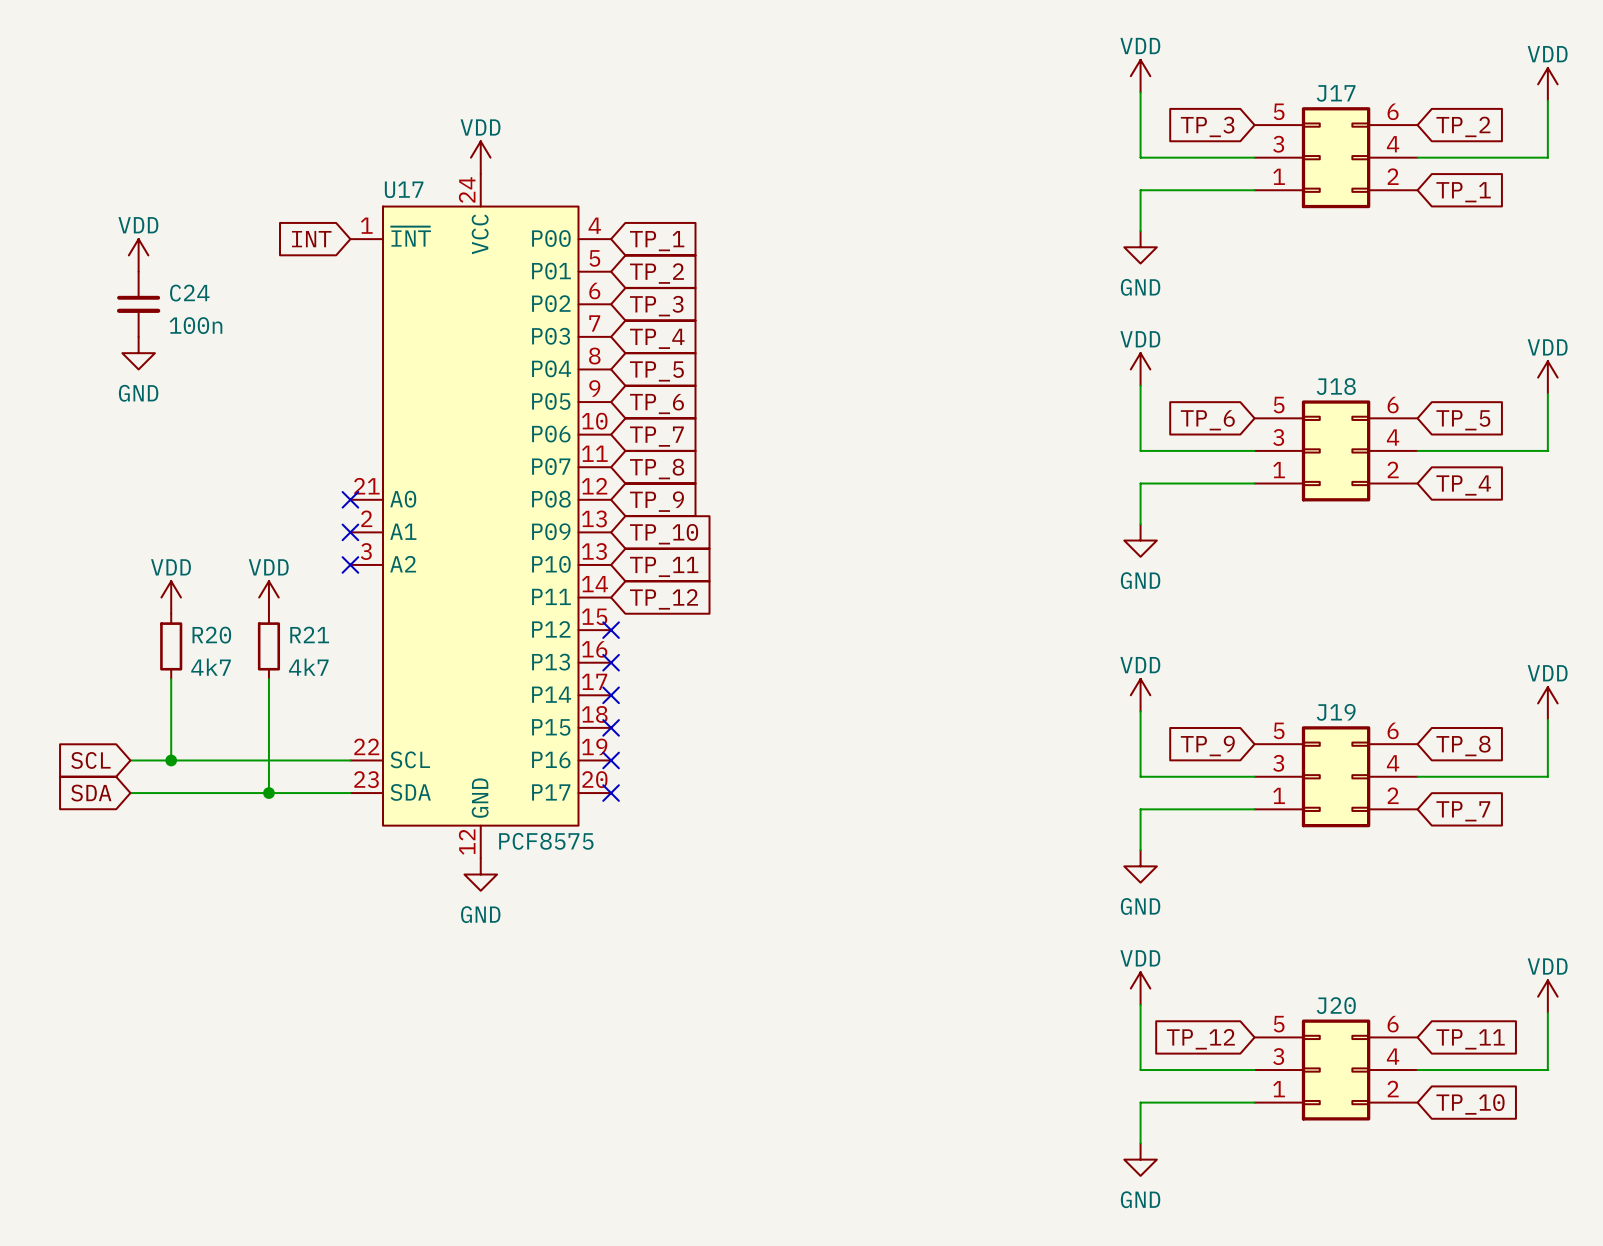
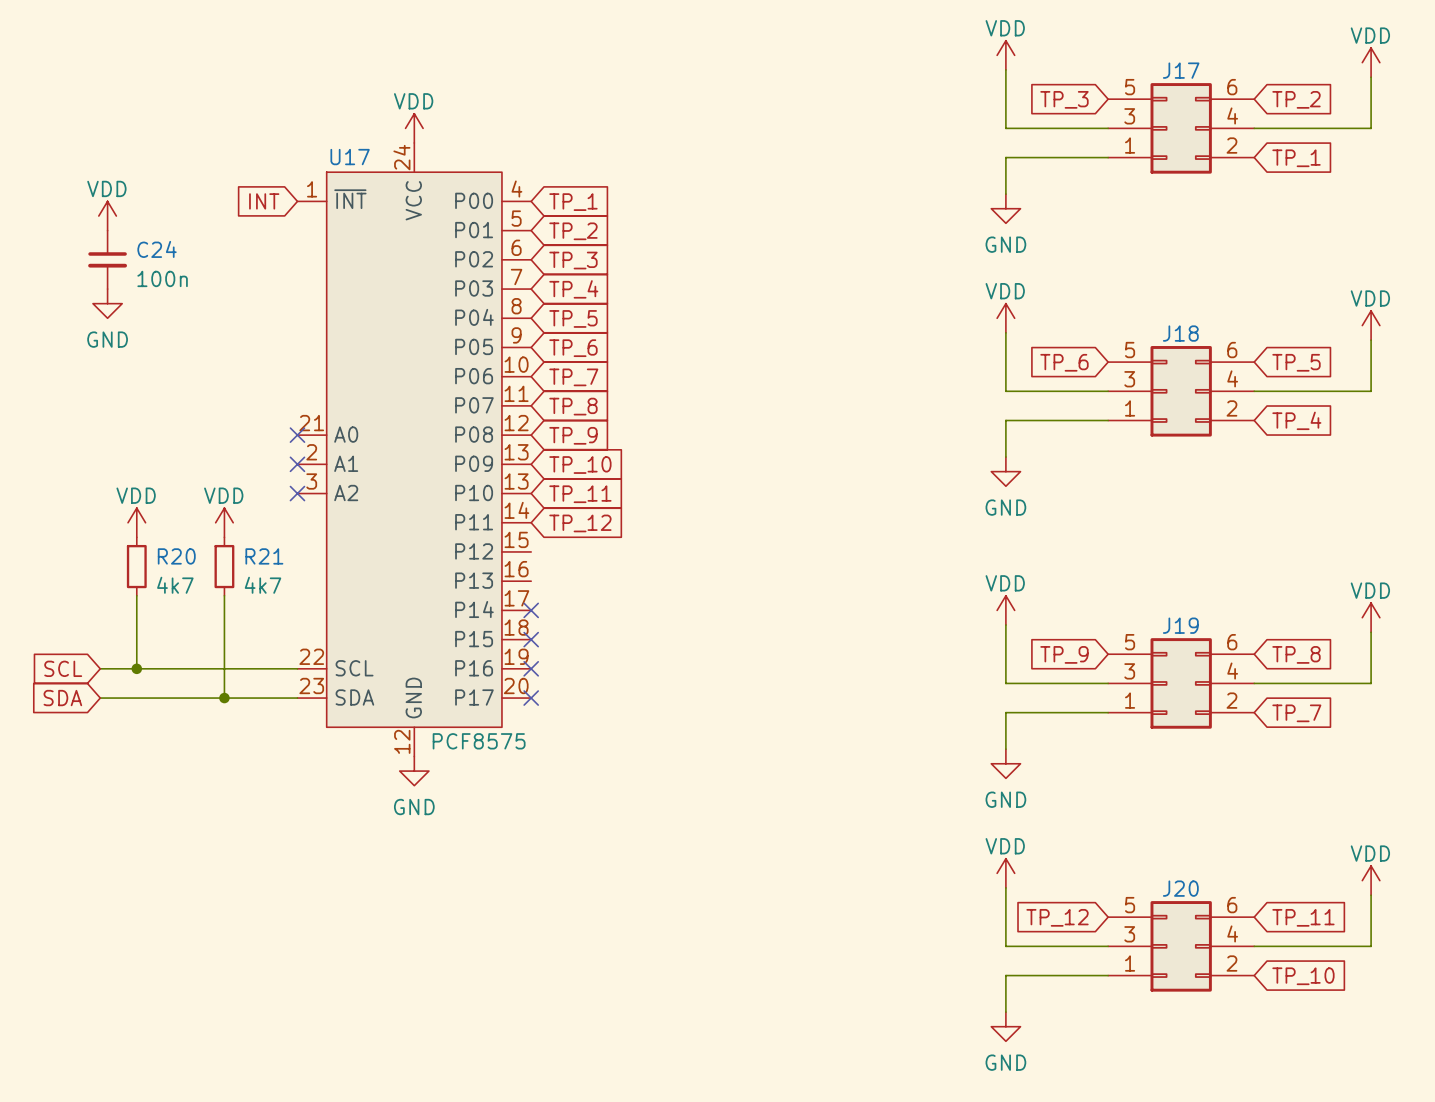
no-connect mark: (611, 630) -> none
no-connect mark: (611, 662) -> none

